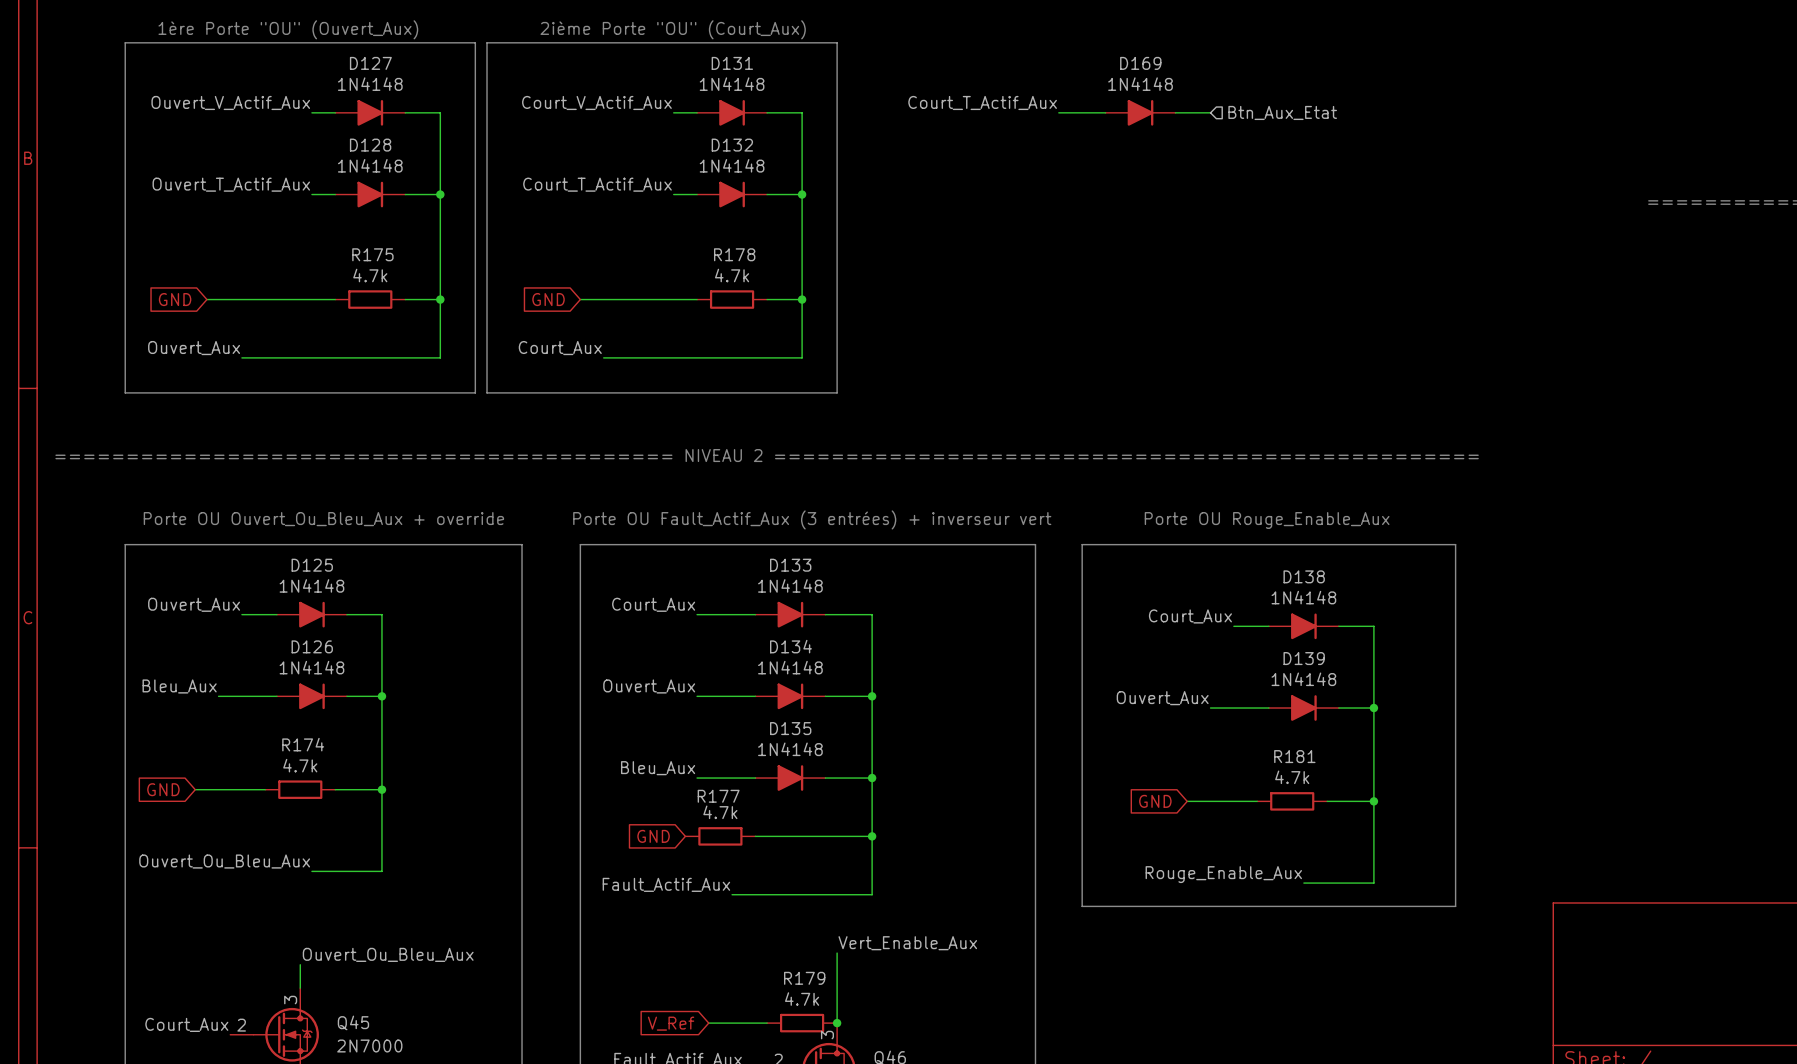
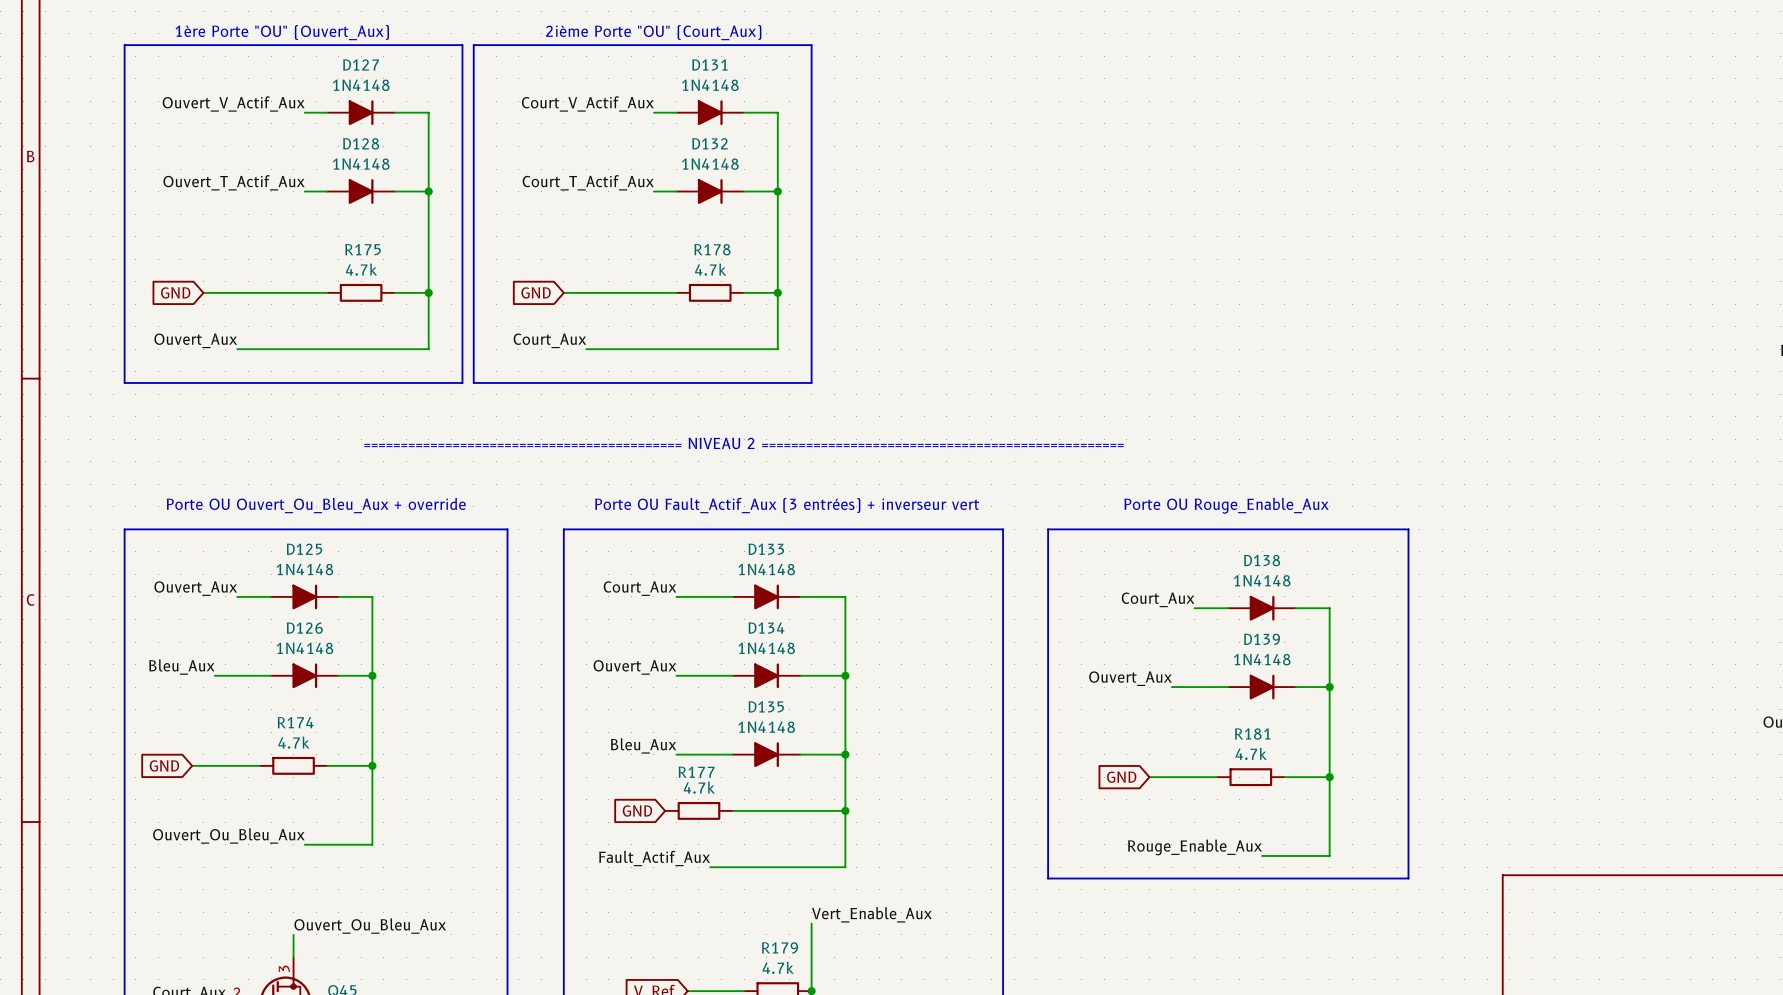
label: Court_T_Actif_Aux (982, 102) -> none
wire: (1058, 112) (1105, 112) -> none
D169: 1N4148 (1140, 112) -> none
wire: (1175, 112) (1210, 112) -> none
hierarchical label: Btn_Aux_Etat (1282, 112) -> none

